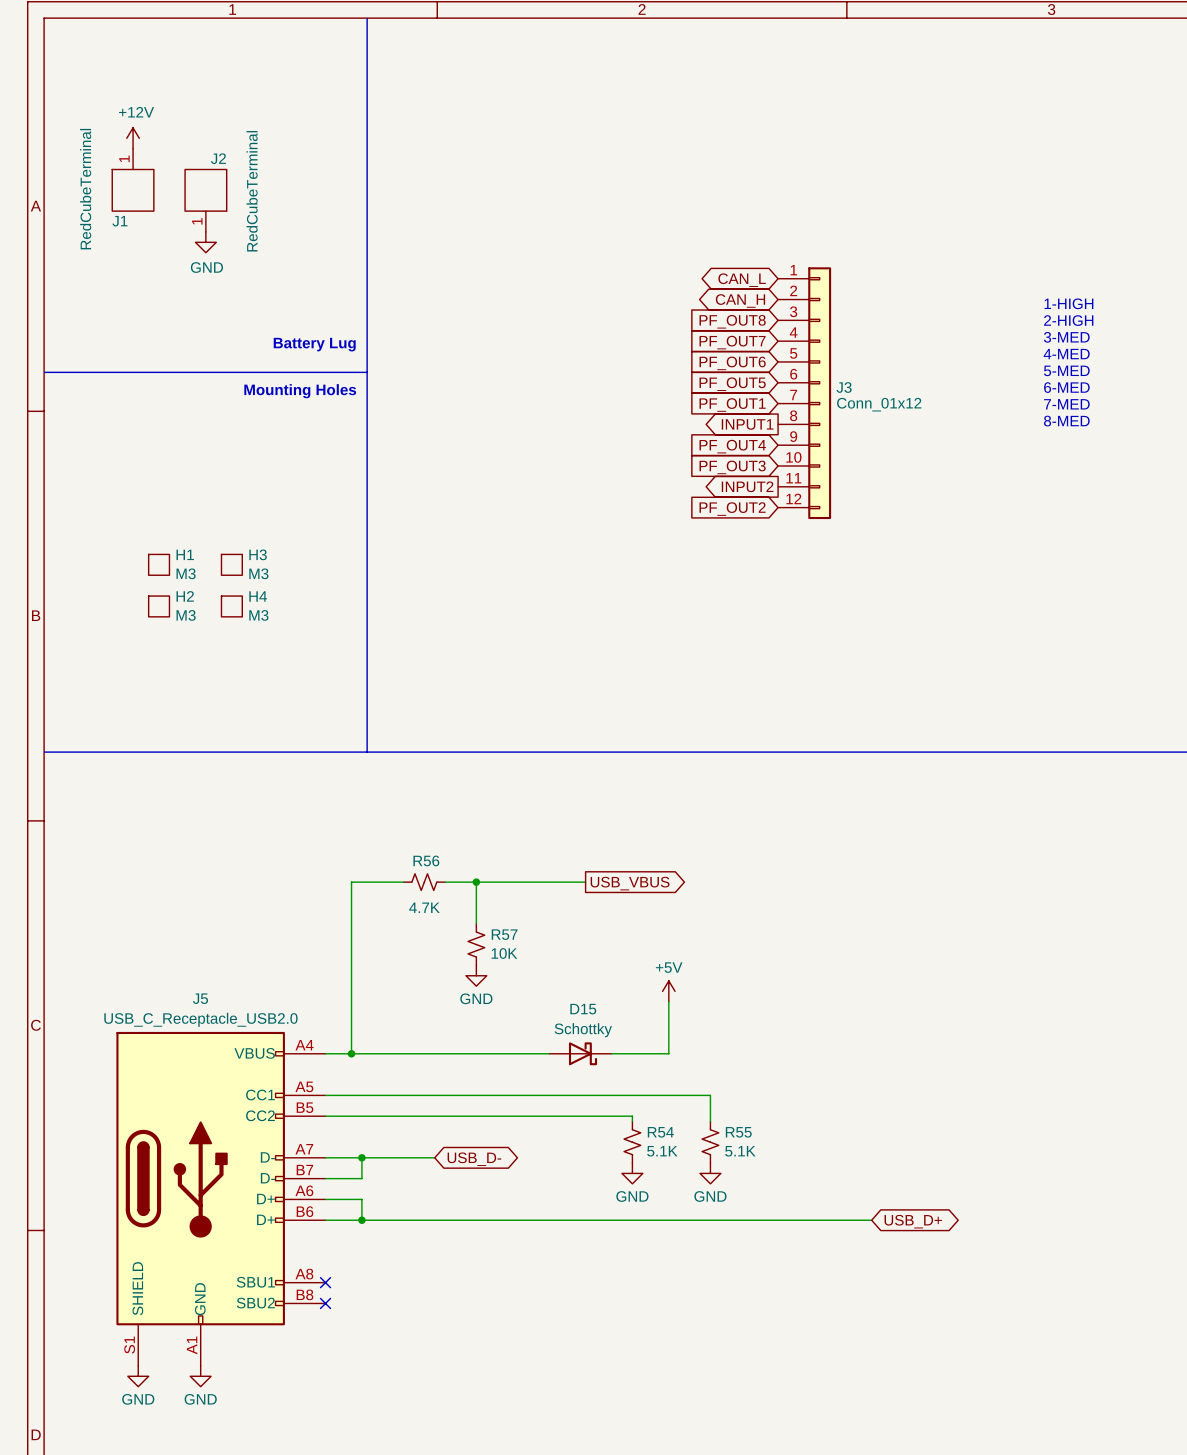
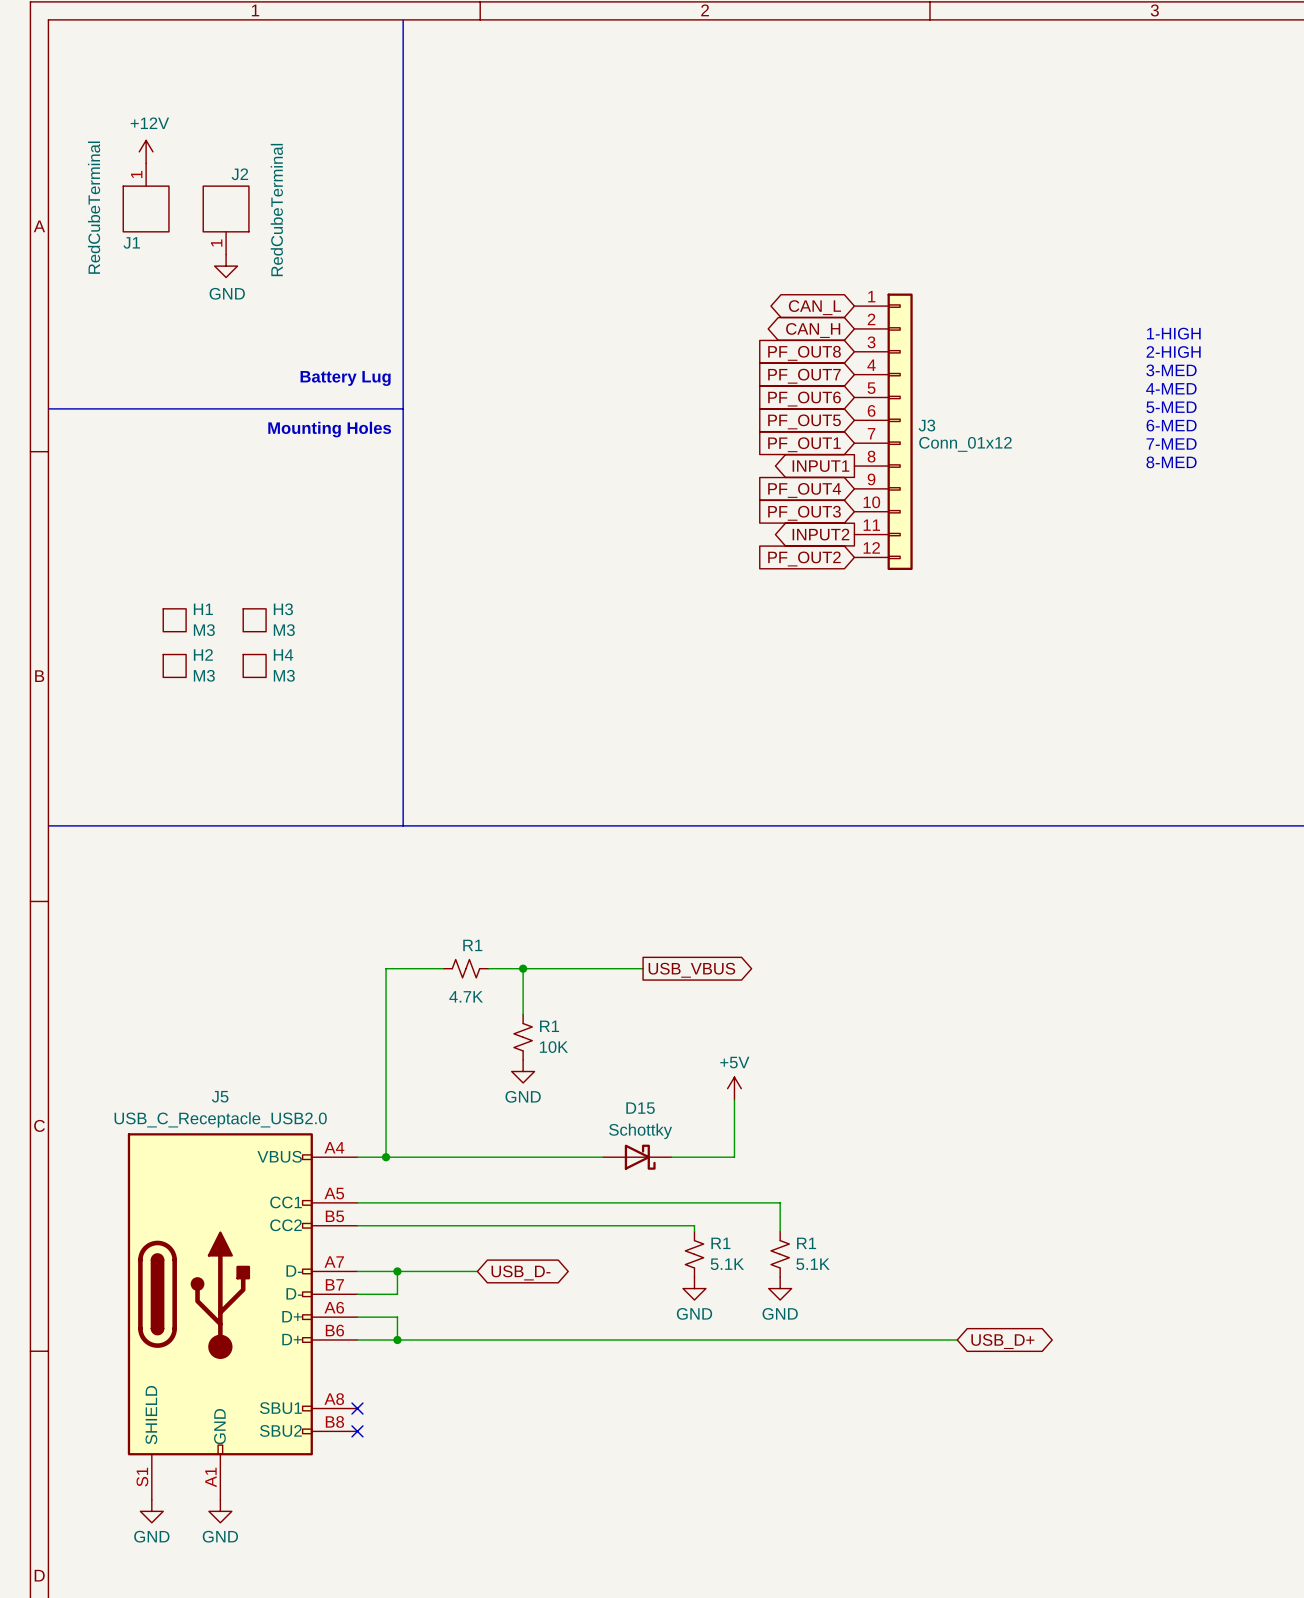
R56 name: R56 (426, 860) -> R1 (472, 945)
R57 name: R57 (504, 934) -> R1 (549, 1026)
R54 name: R54 (660, 1132) -> R1 (720, 1243)
R55 name: R55 (738, 1132) -> R1 (806, 1243)

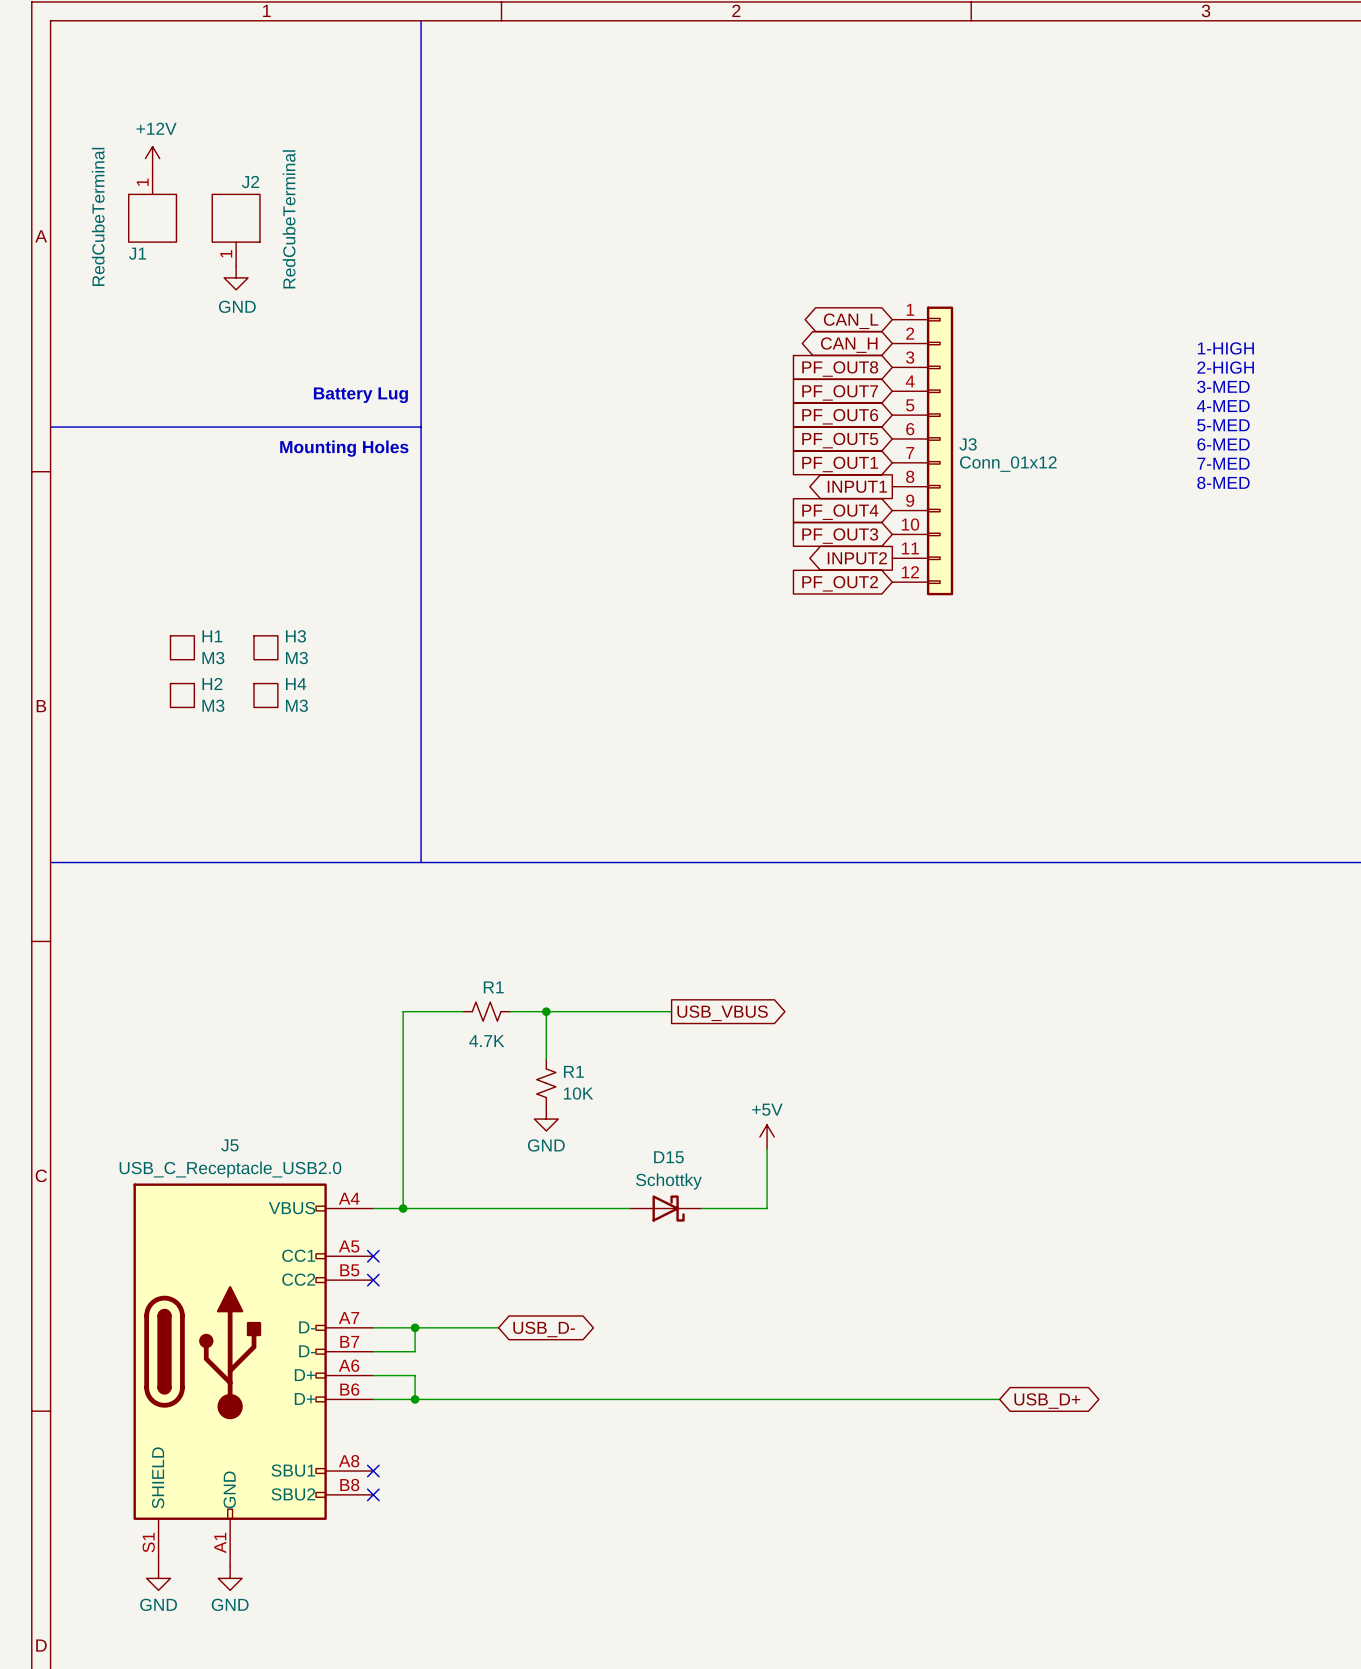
wire: (357, 1202) (780, 1202) (780, 1231) -> none
no-connect mark: none -> (373, 1256)
wire: (357, 1225) (694, 1225) (694, 1231) -> none
no-connect mark: none -> (373, 1280)
R1: 5.1K (694, 1254) -> none
R1: 5.1K (780, 1254) -> none
power symbol: GND (694, 1288) -> none
power symbol: GND (780, 1288) -> none

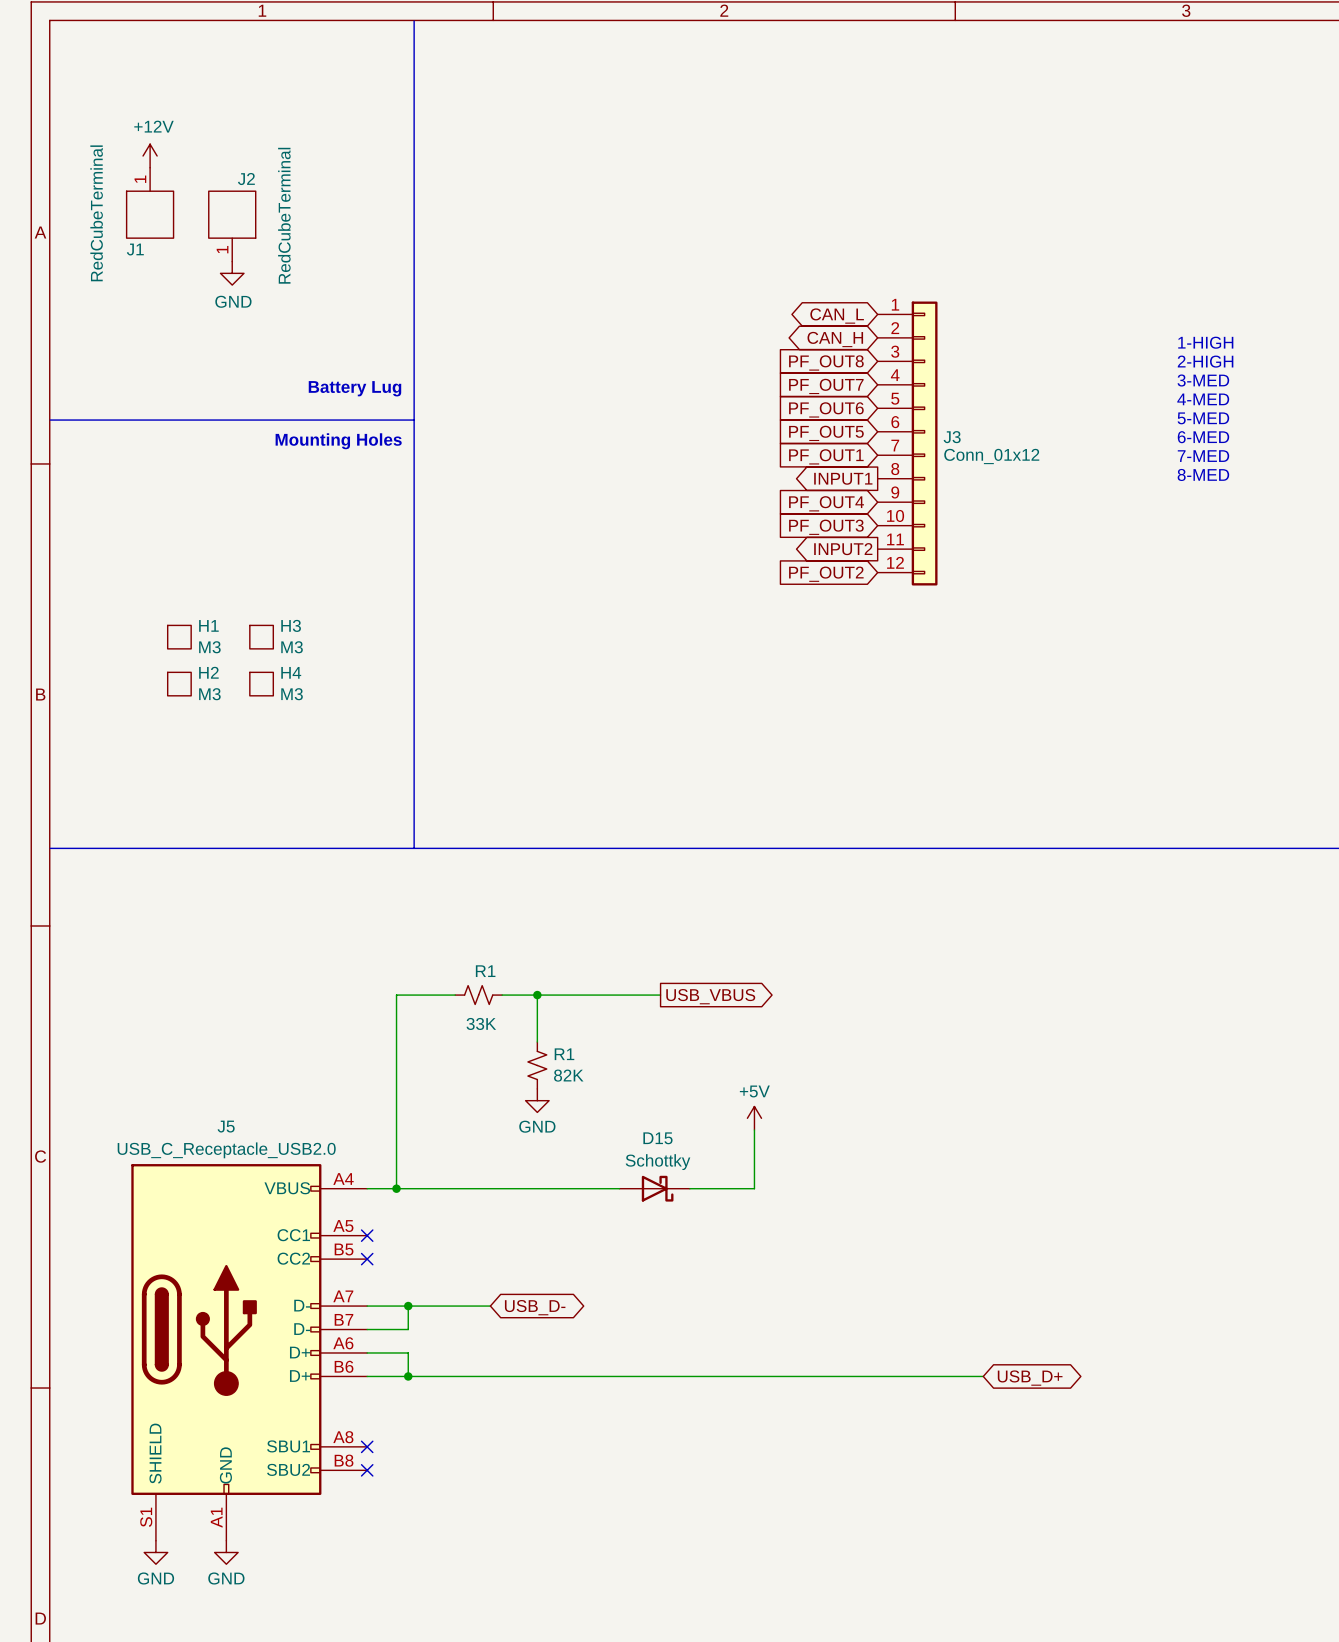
R1 value: 4.7K (486, 1041) -> 33K (481, 1023)
R1 value: 10K (578, 1093) -> 82K (568, 1075)

